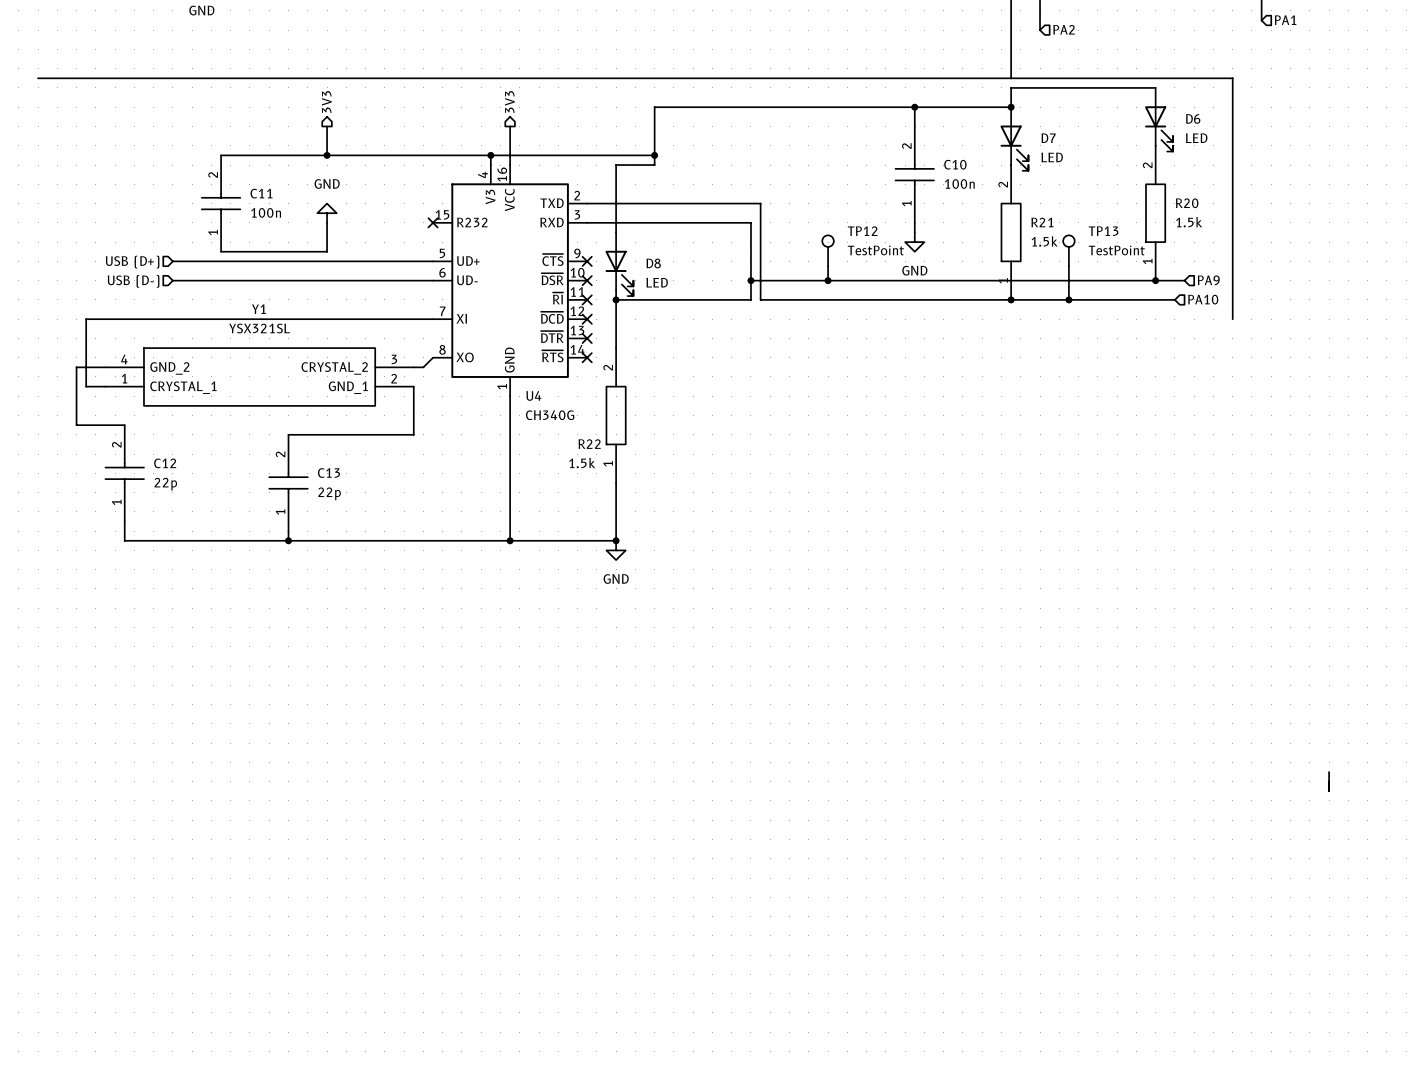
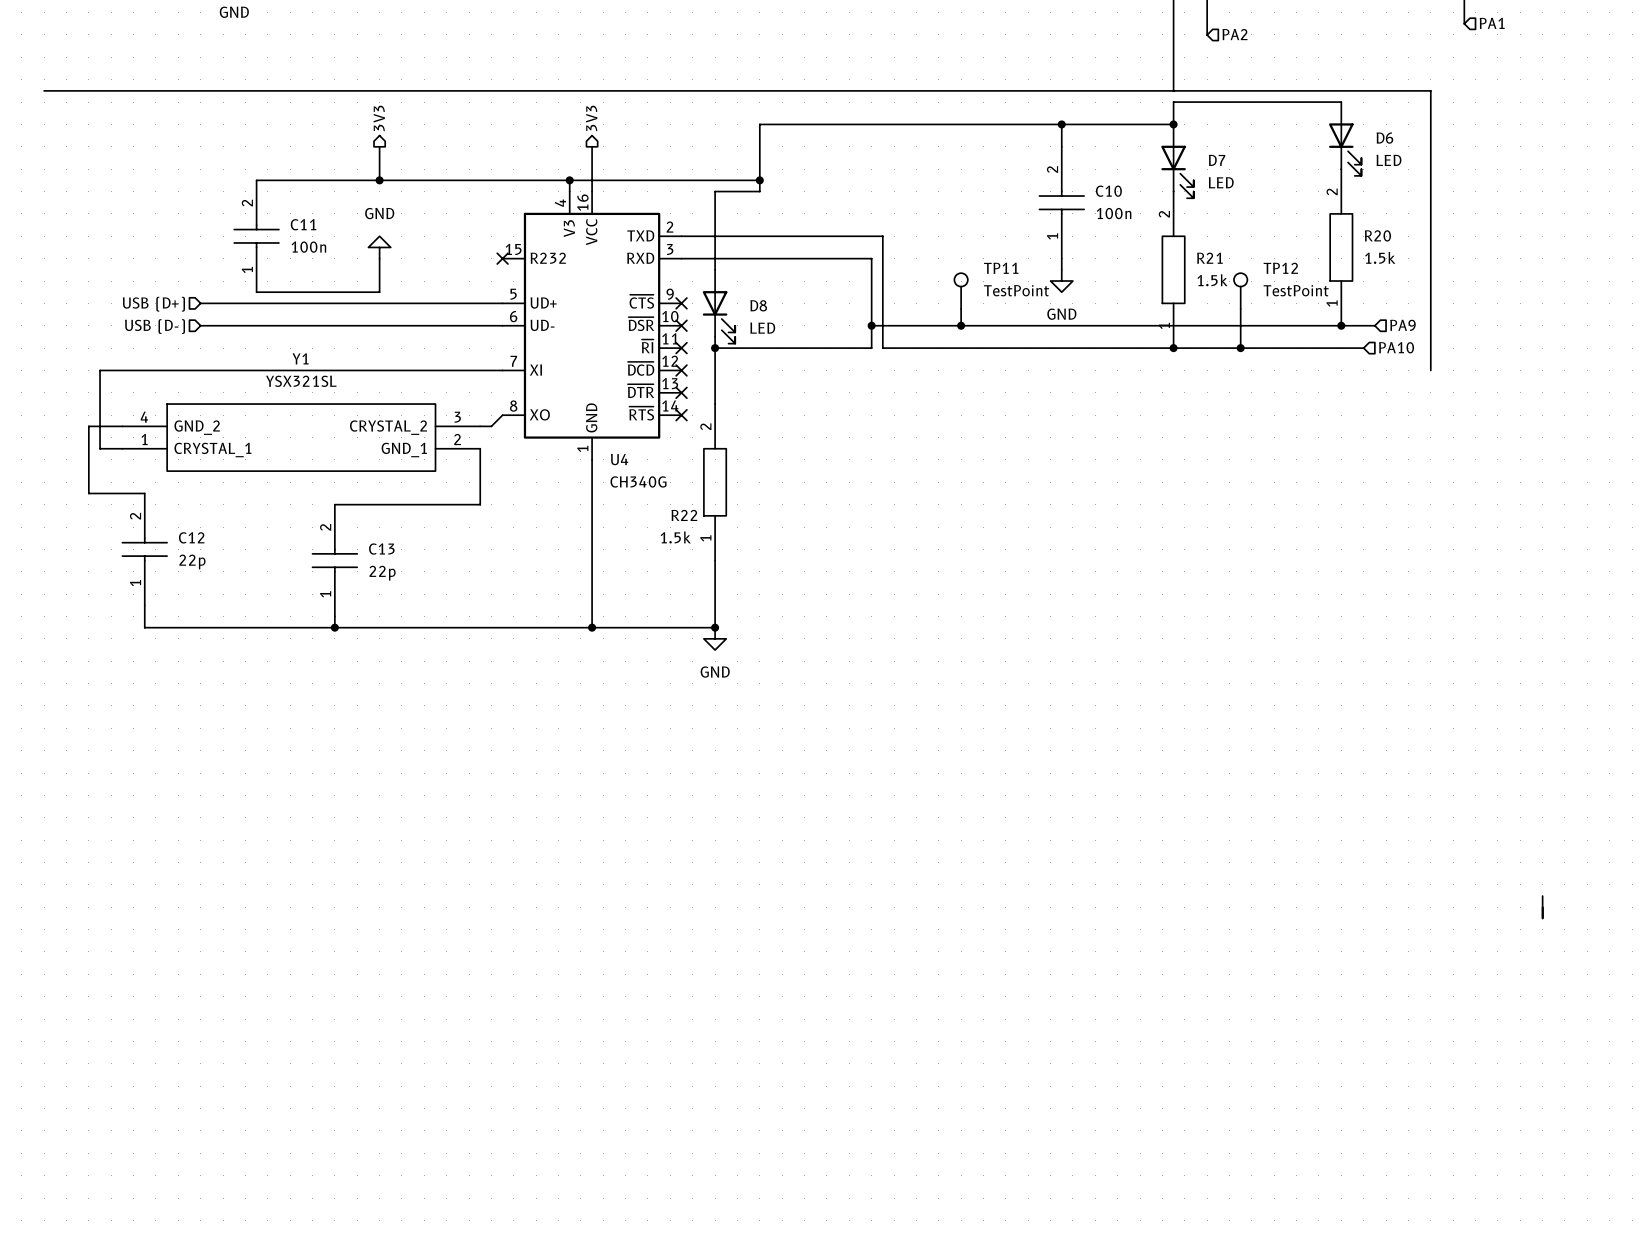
TP12 name: TP12 (862, 231) -> TP11 (1001, 268)
TP13 name: TP13 (1103, 231) -> TP12 (1280, 268)

